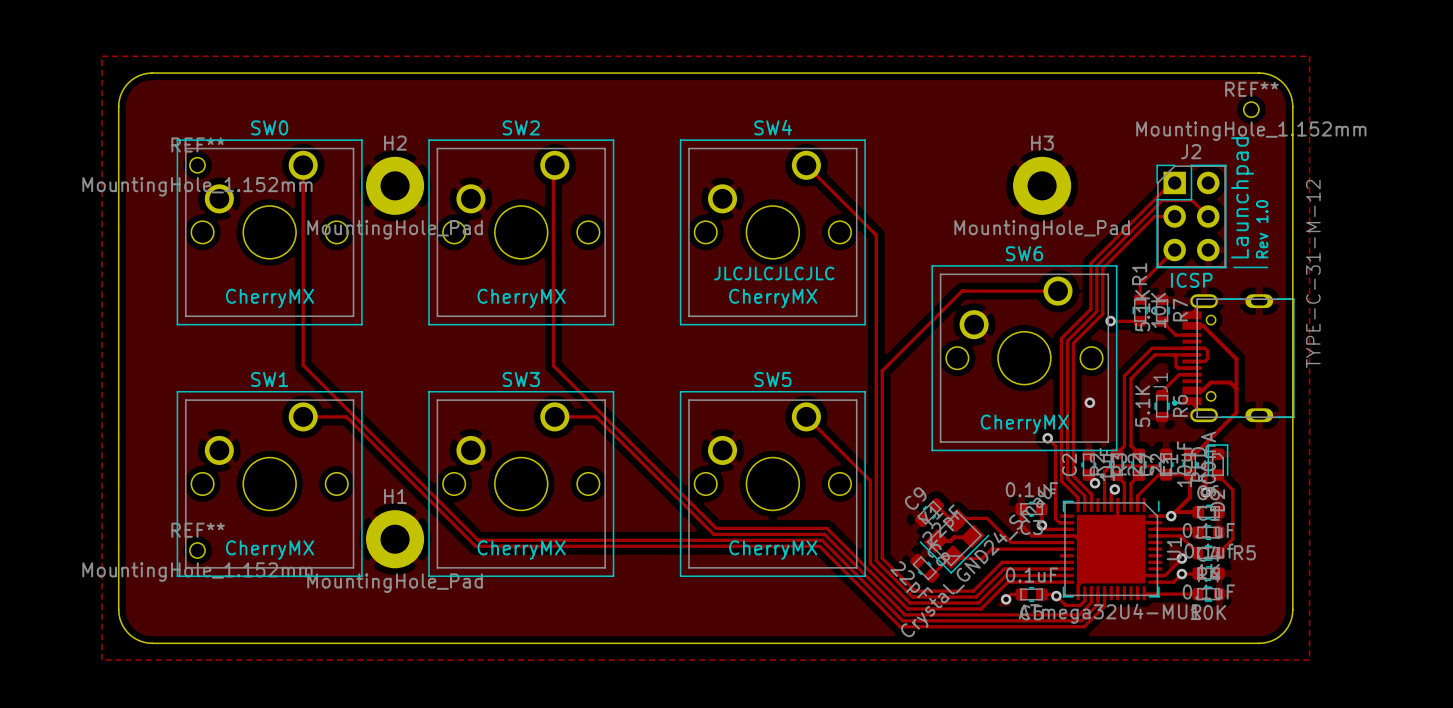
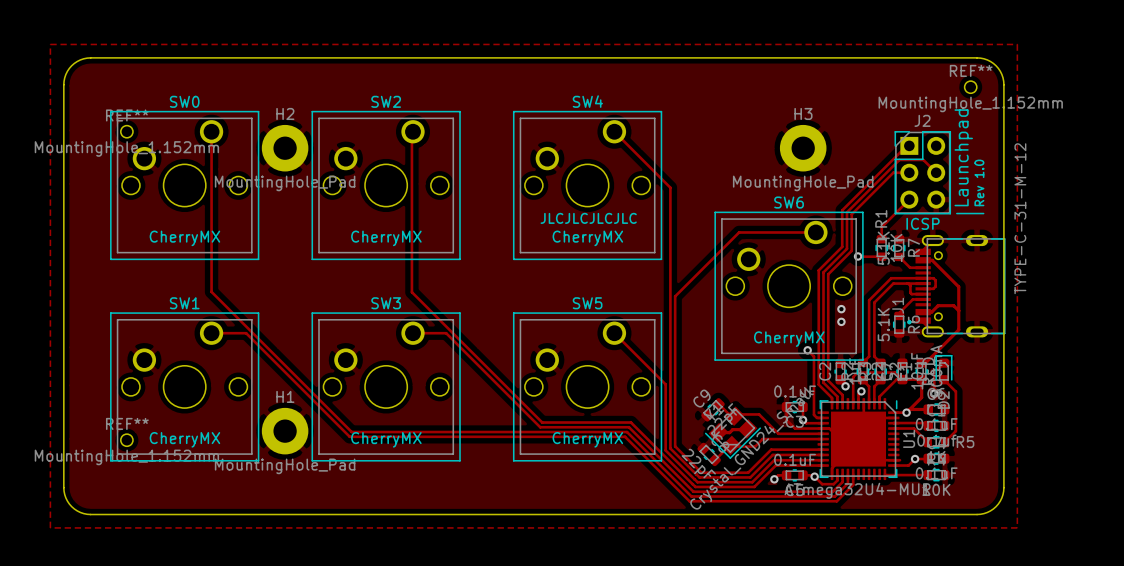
via: none -> (841, 309)
via: (1181, 558) -> none
track: (1182, 558) (1163, 575) -> none

